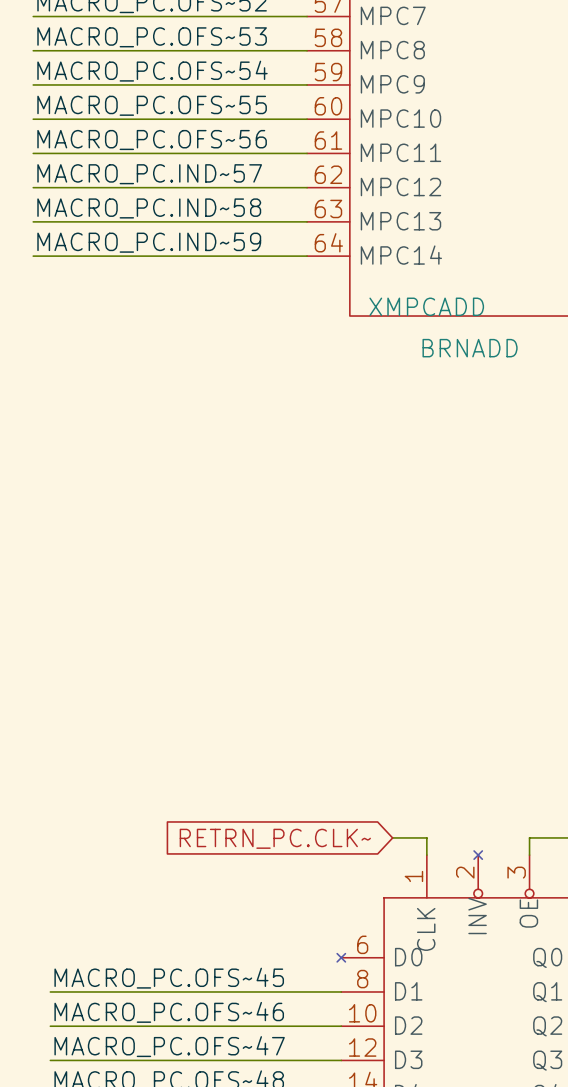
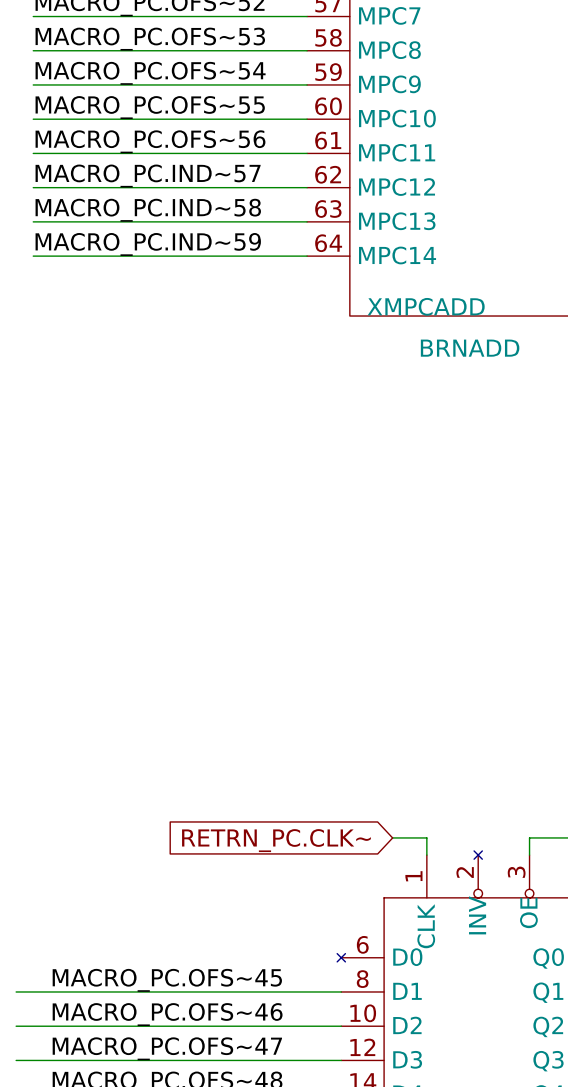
wire: none -> (16, 991) (50, 991)
wire: none -> (16, 1026) (50, 1026)
wire: none -> (16, 1060) (50, 1060)

